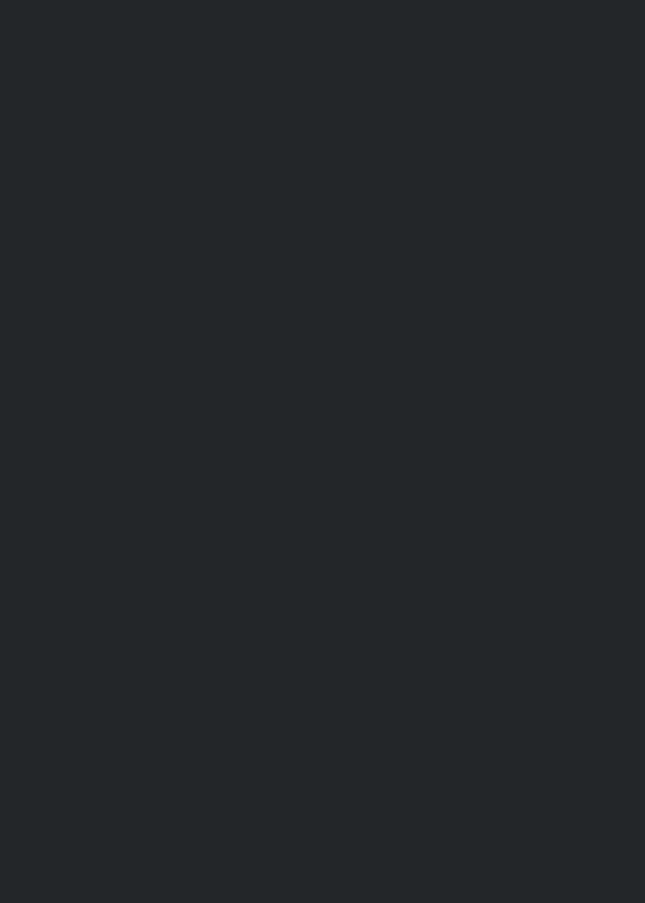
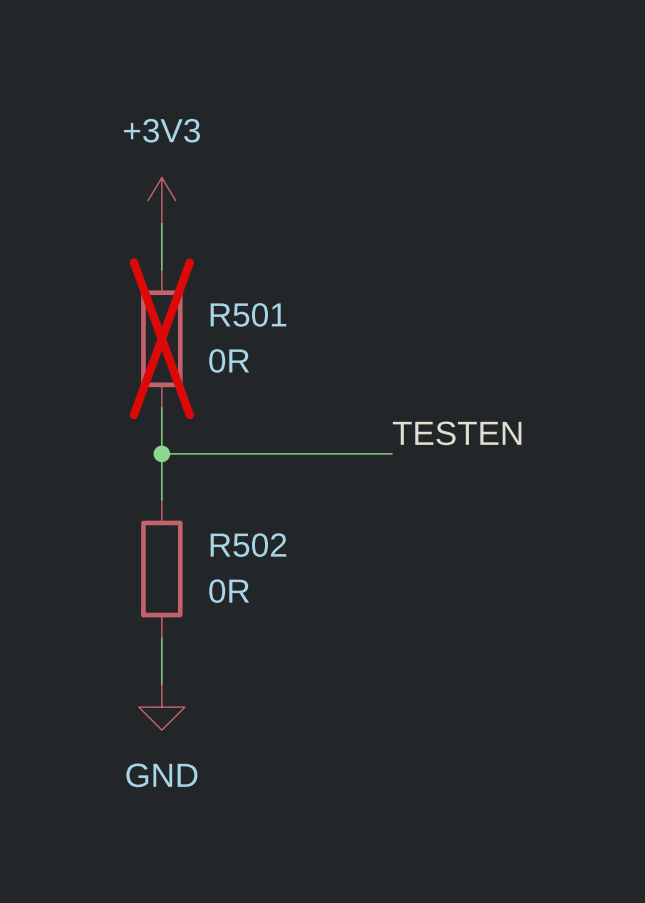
power symbol: none -> +3V3 (161, 200)
wire: none -> (161, 223) (161, 269)
R501: none -> 0R (161, 338)
wire: none -> (161, 407) (161, 499)
label: none -> TESTEN (457, 433)
wire: none -> (161, 453) (392, 453)
junction: none -> (161, 453)
R502: none -> 0R (161, 569)
wire: none -> (161, 638) (161, 684)
power symbol: none -> GND (161, 707)

